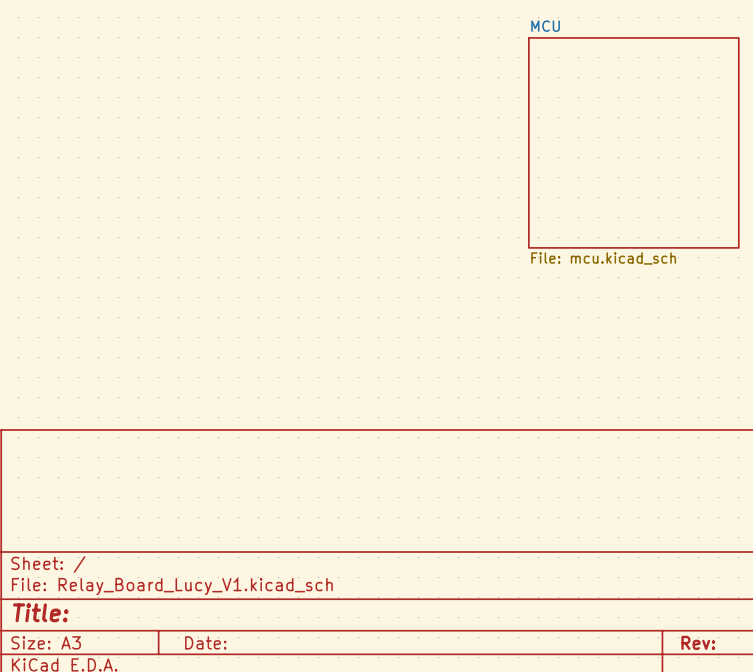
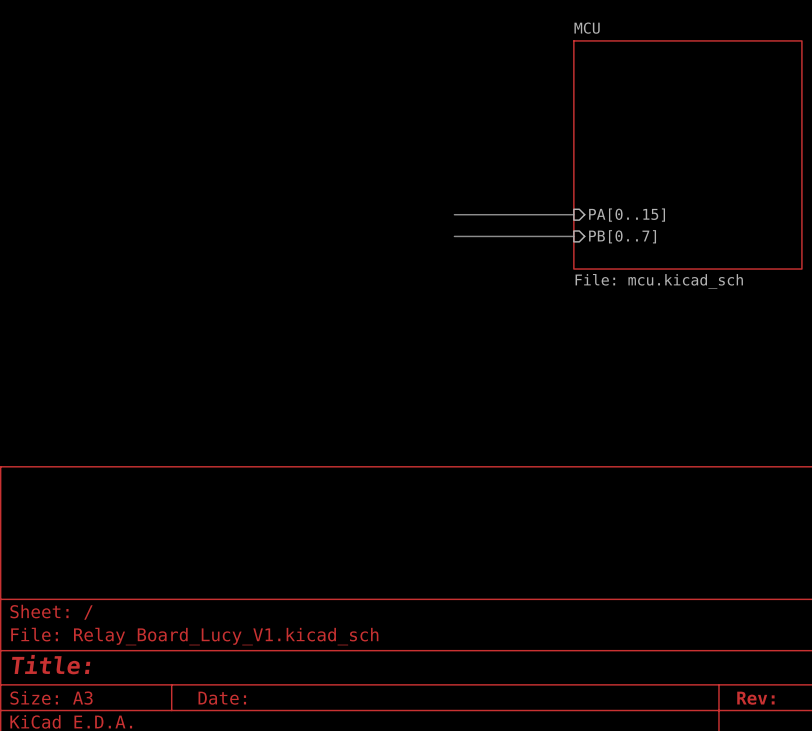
bus: none -> (454, 214) (573, 214)
sheet pin: none -> PA[0..15] (627, 215)
bus: none -> (454, 236) (573, 236)
sheet pin: none -> PB[0..7] (622, 236)

